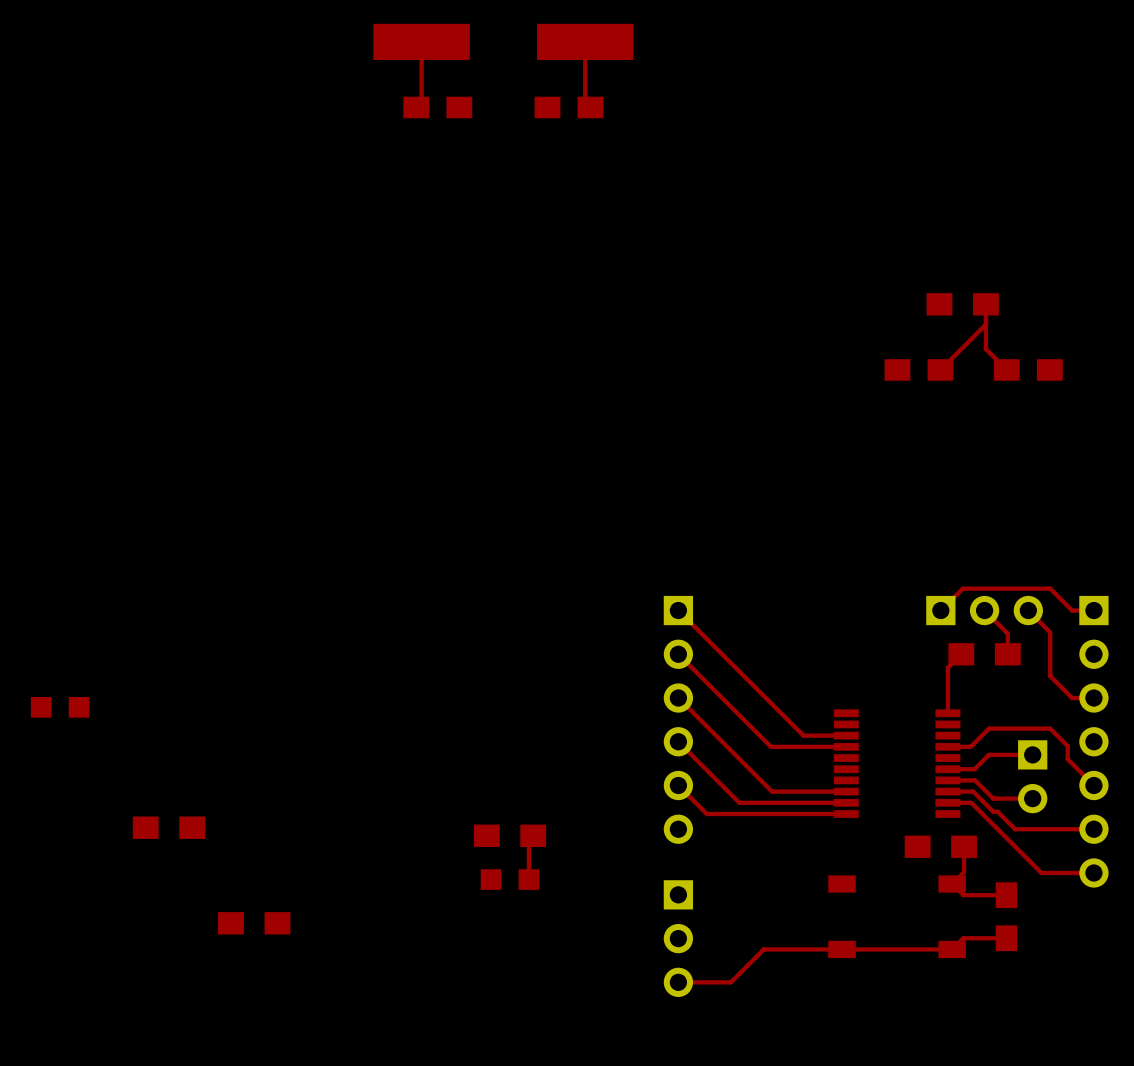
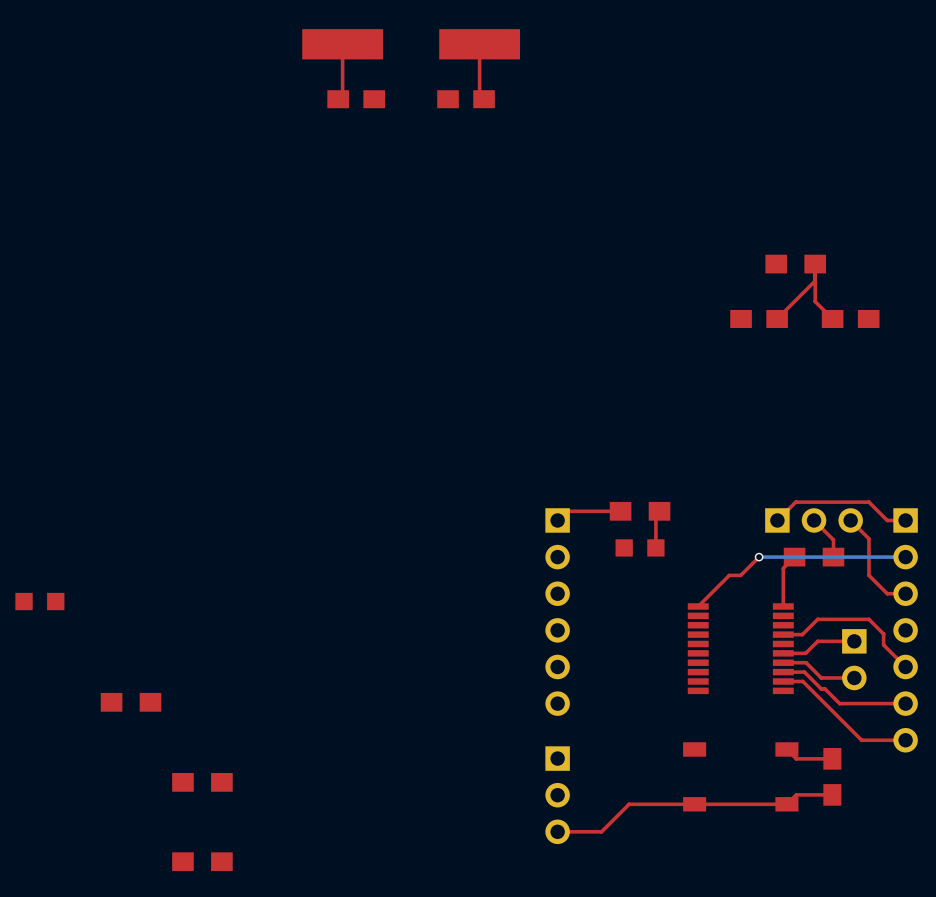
part: none -> (640, 511)
top track: (678, 610) (803, 735) (846, 735) -> (557, 520) (566, 511) (620, 511)
top track: (678, 654) (770, 746) (846, 746) -> none
top track: none -> (759, 557) (740, 575) (729, 575) (698, 606)
via: none -> (759, 557)
bottom track: none -> (905, 557) (759, 557)
top track: (678, 698) (771, 791) (846, 791) -> none
top track: (678, 741) (739, 802) (846, 802) -> none
top track: (678, 785) (706, 814) (846, 814) -> none
part: (509, 835) -> none
top track: (533, 835) (528, 840) (528, 879) -> (659, 511) (655, 514) (655, 547)
part: (940, 846) -> none
top track: (964, 846) (964, 872) (952, 884) -> none
part position: (509, 879) -> (640, 547)
part: none -> (202, 861)

